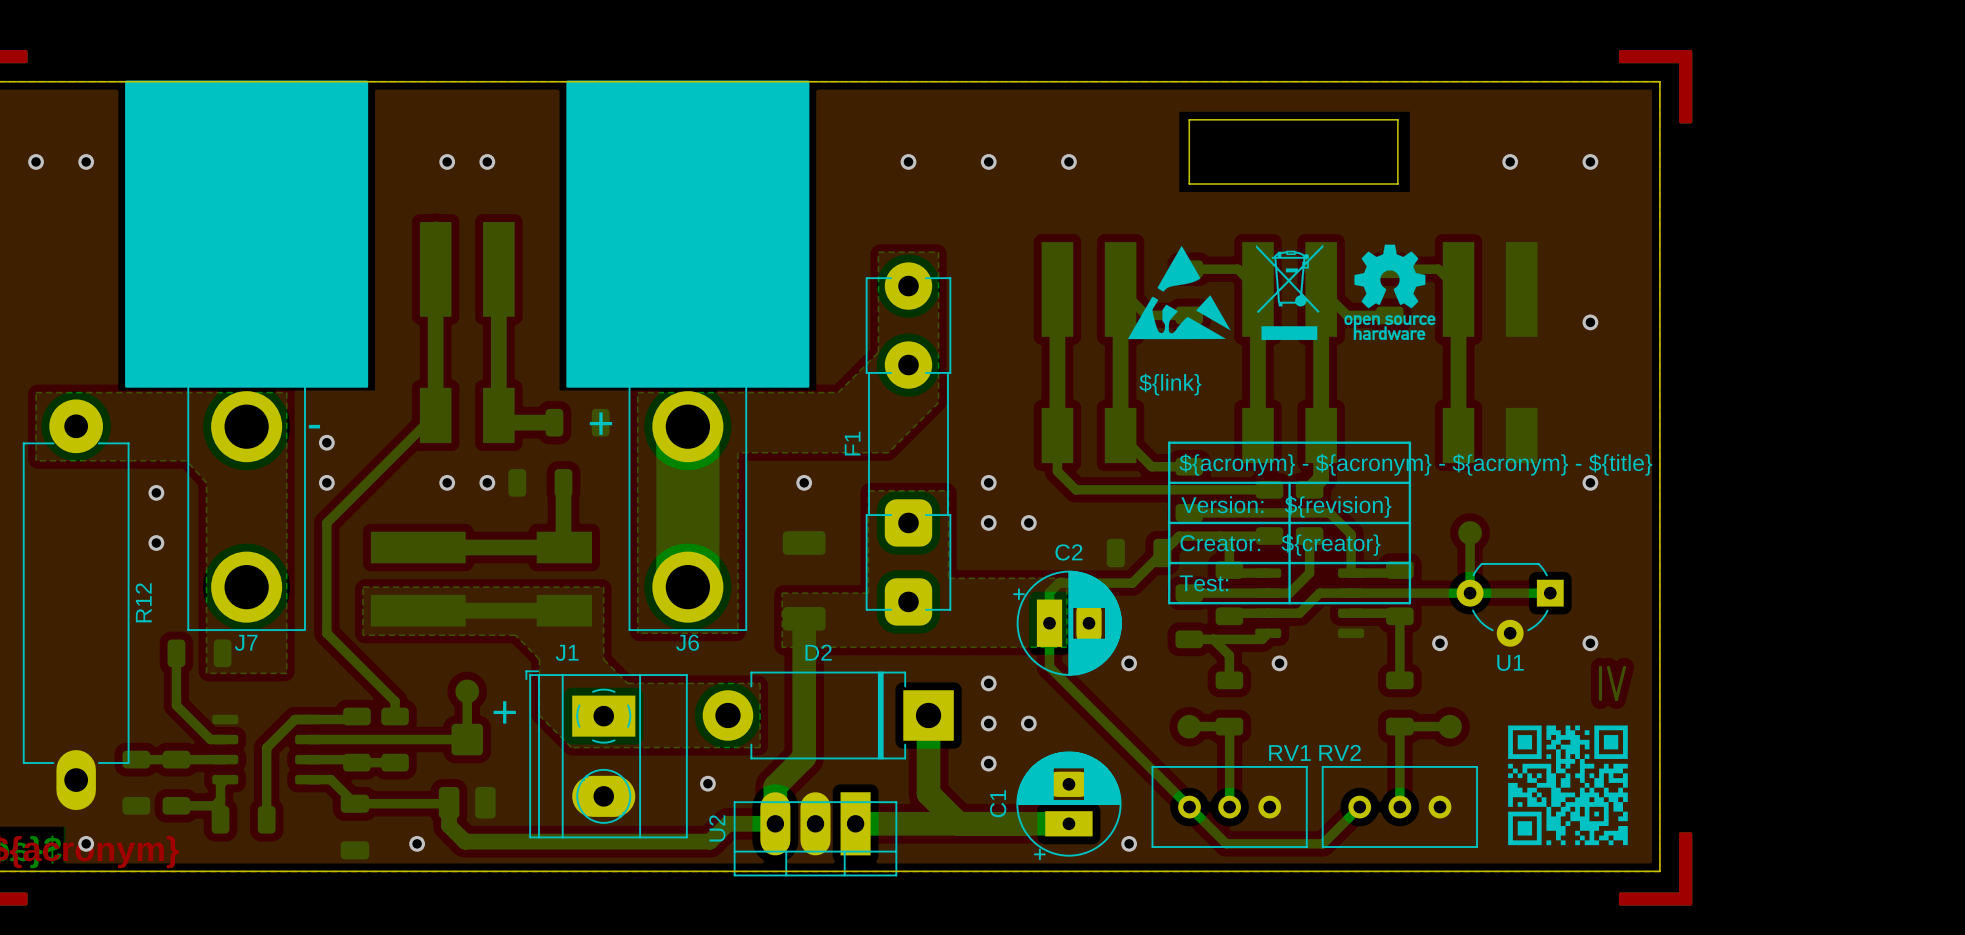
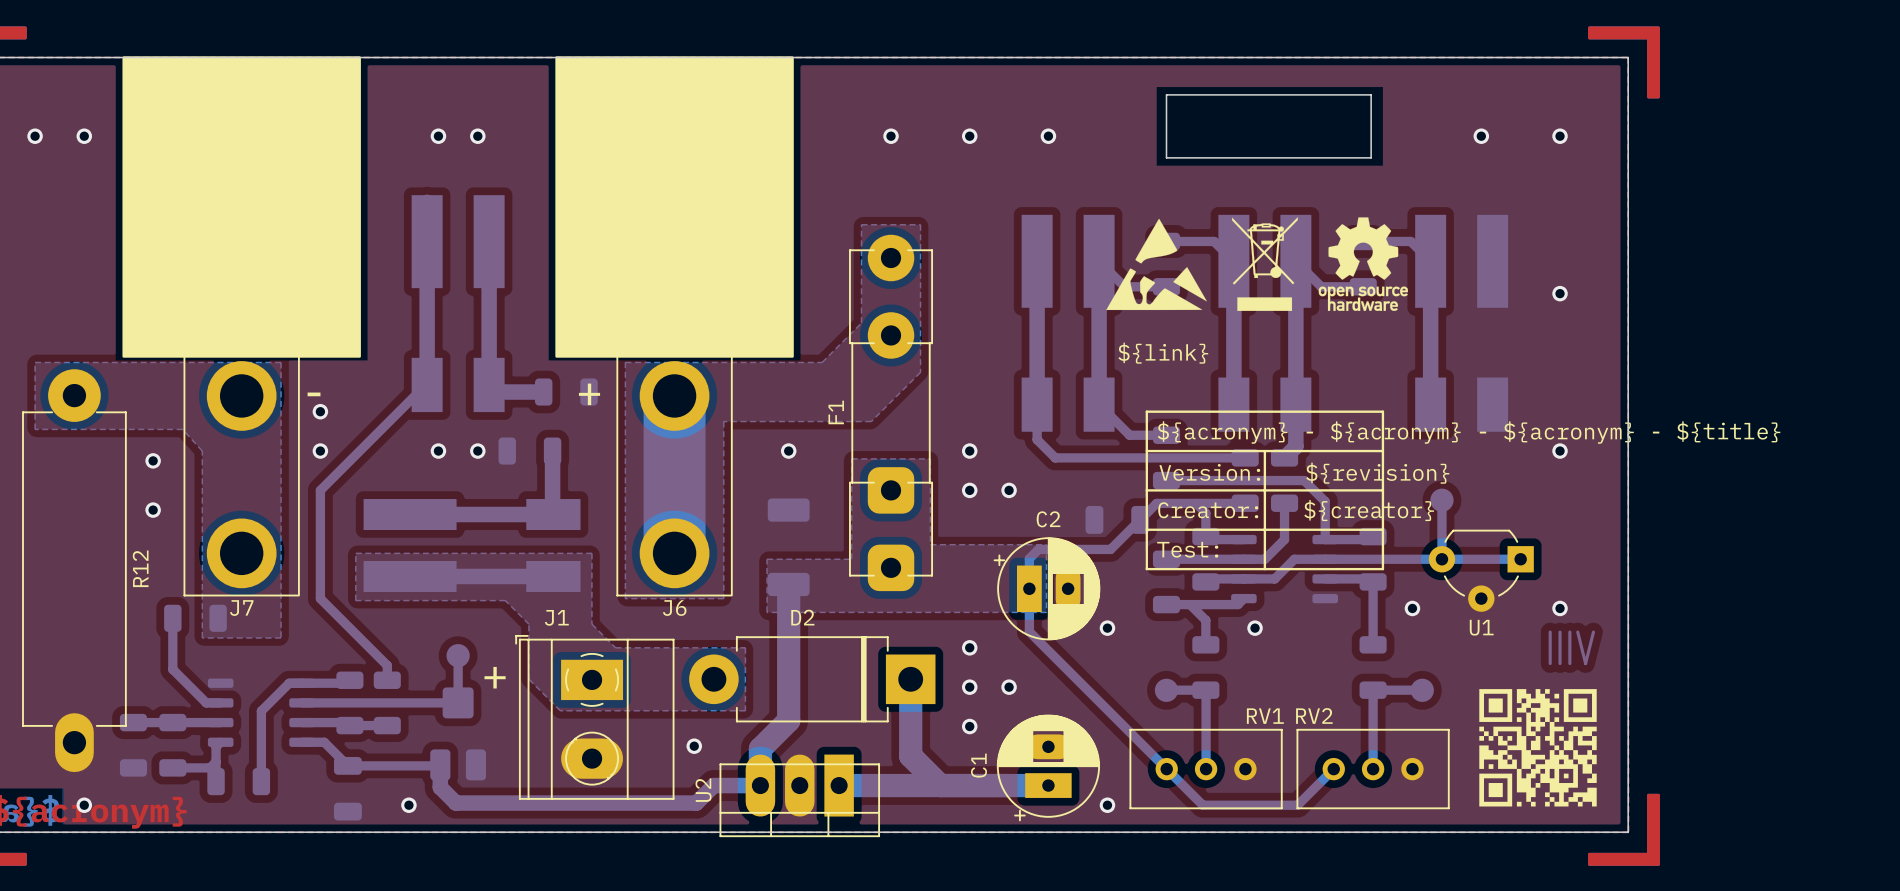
bottom track: none -> (1550, 632) (1550, 663)
bottom track: none -> (1560, 632) (1560, 663)

